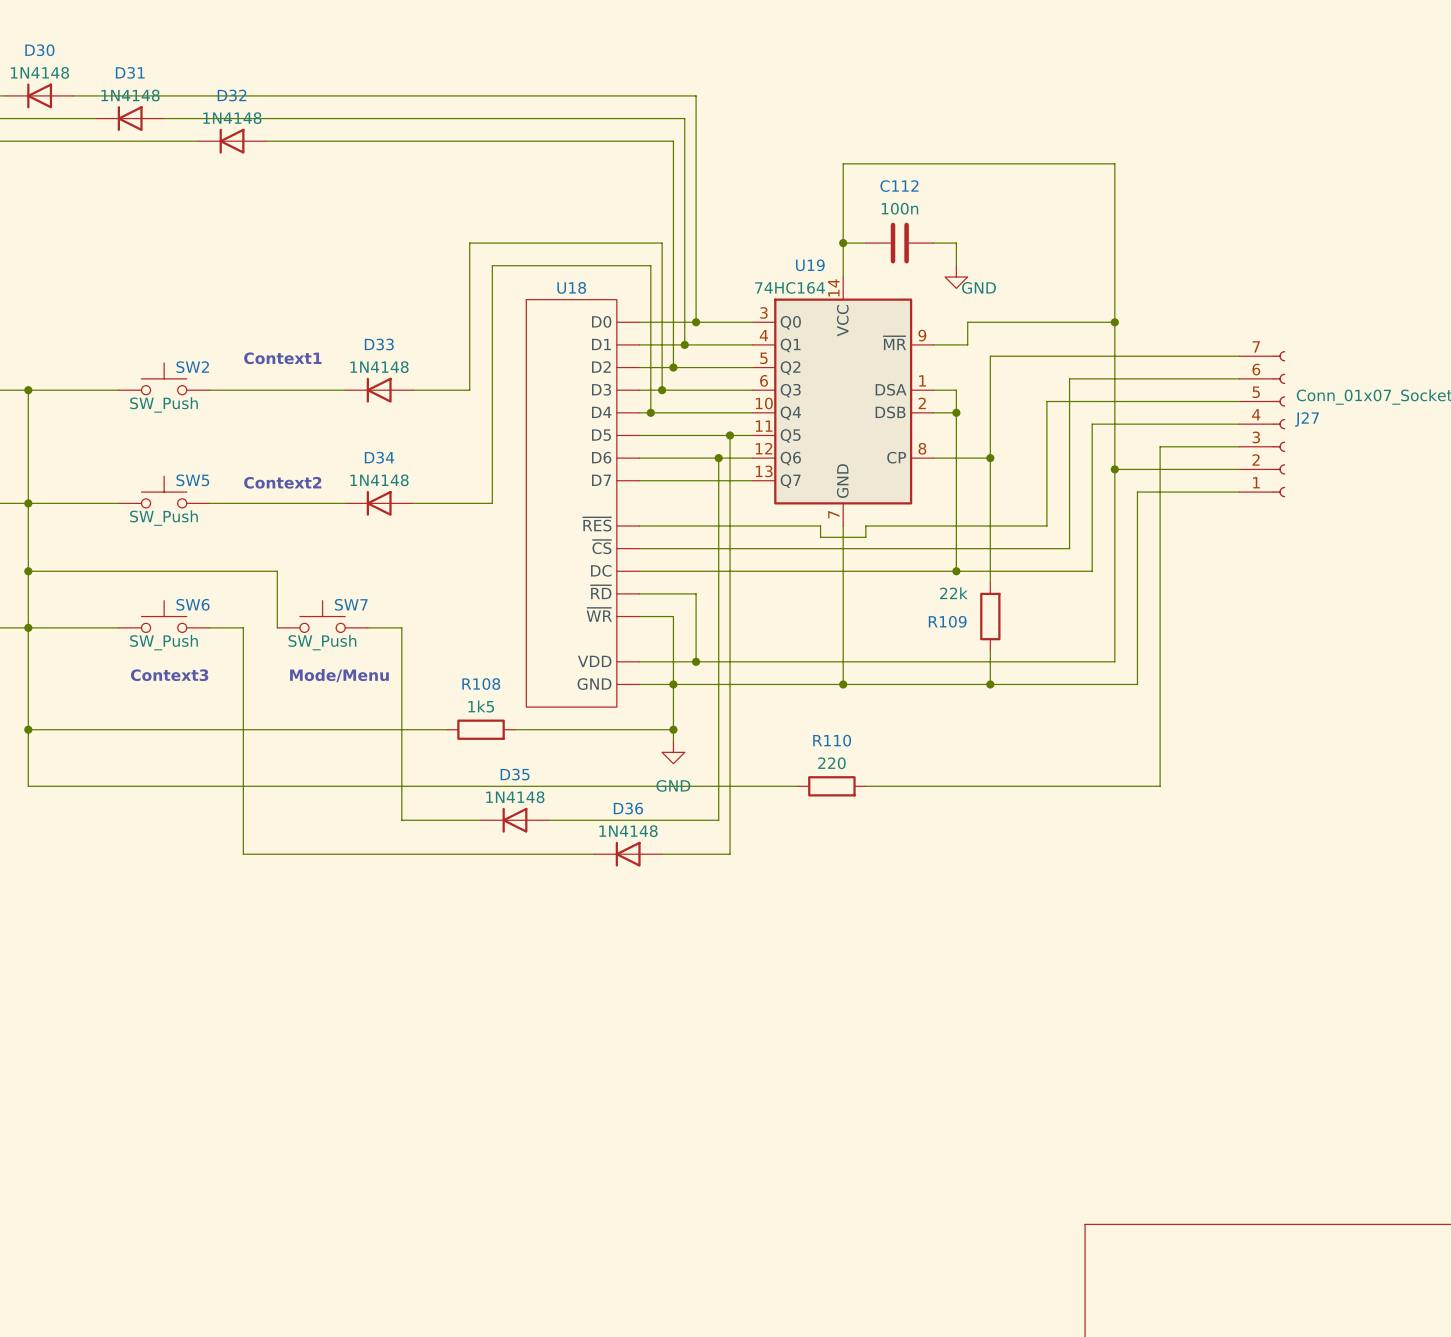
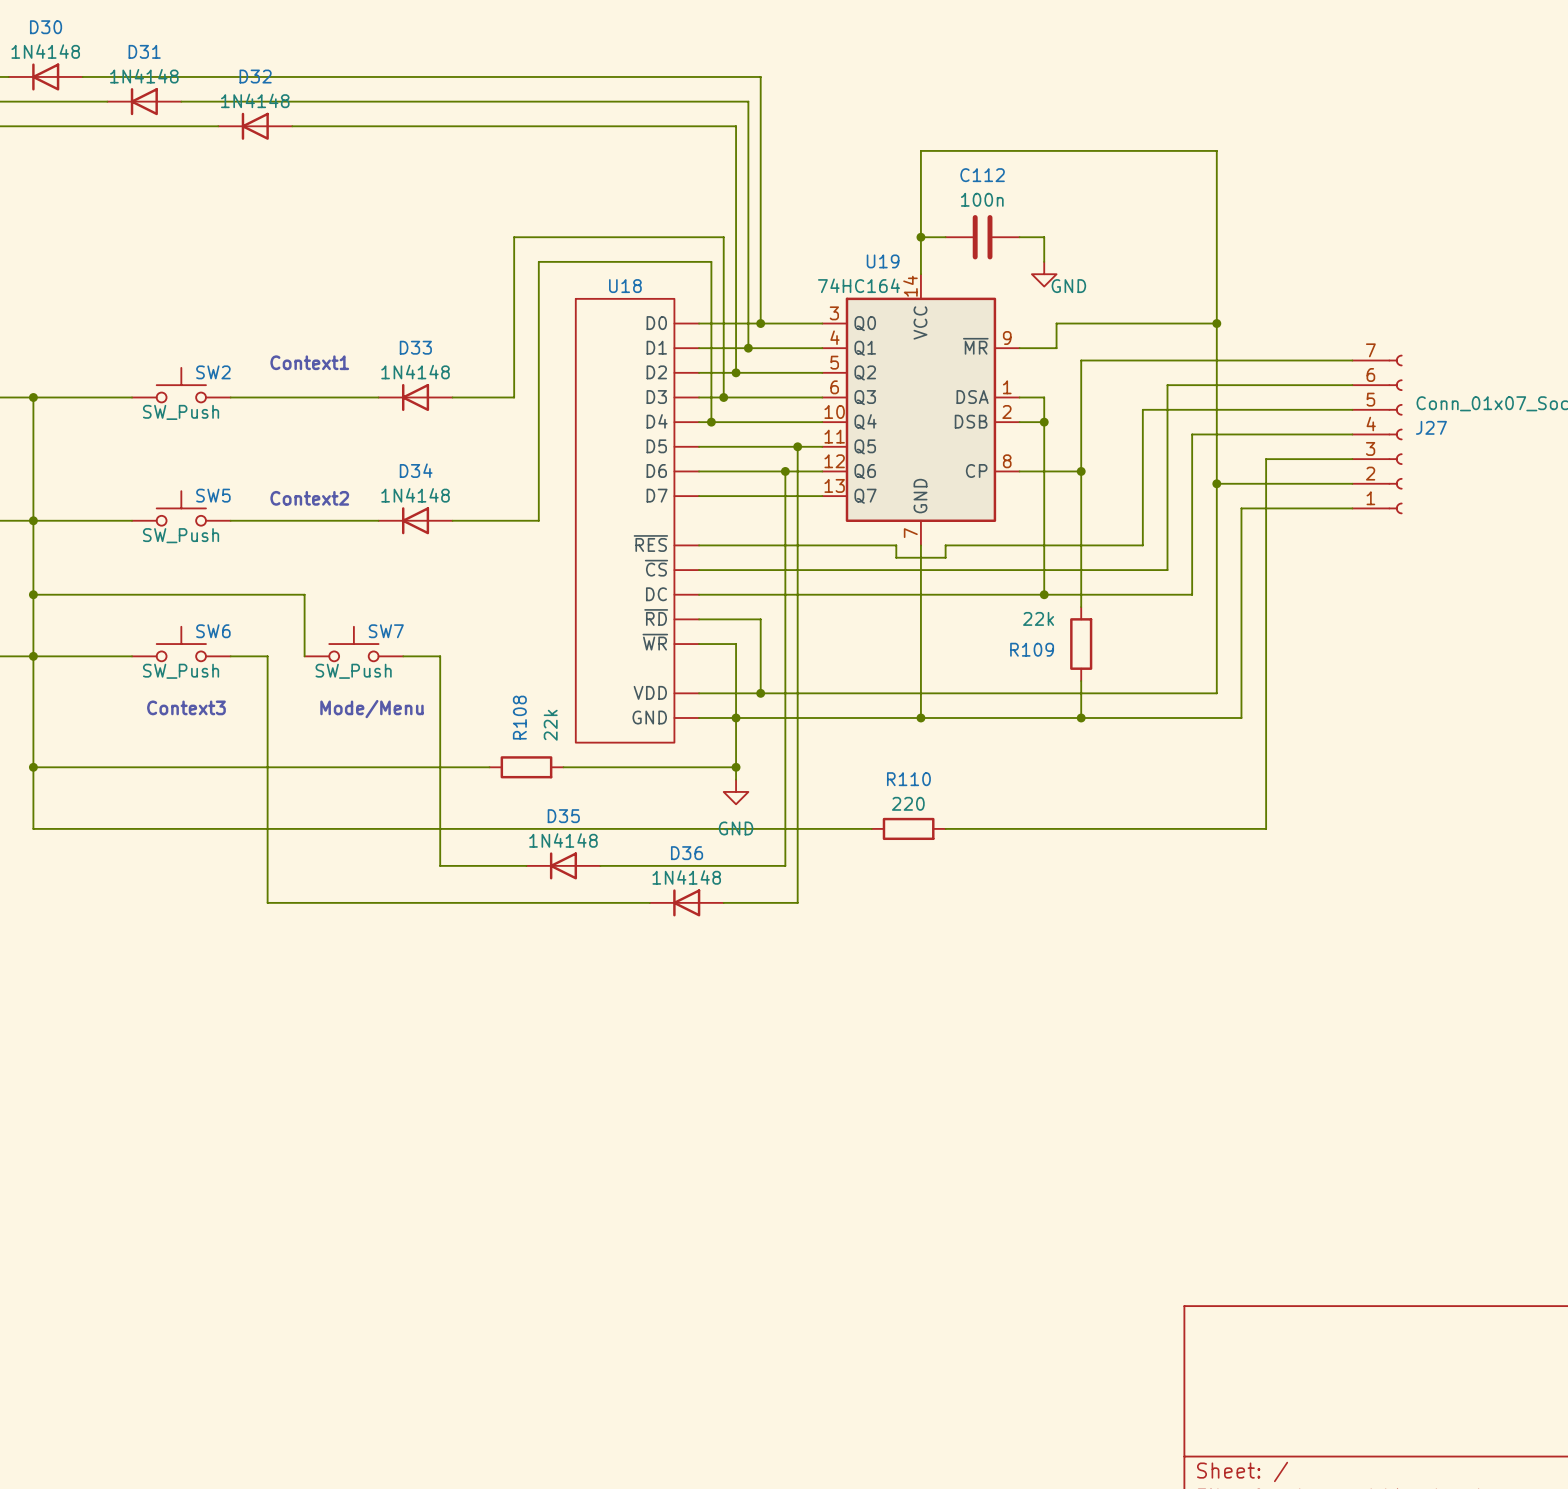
R108 name rotation: 0° (481, 684) -> 90° counterclockwise (519, 717)
R108 text: none -> 22k (550, 725)
R108 value: 1k5 (481, 706) -> none

